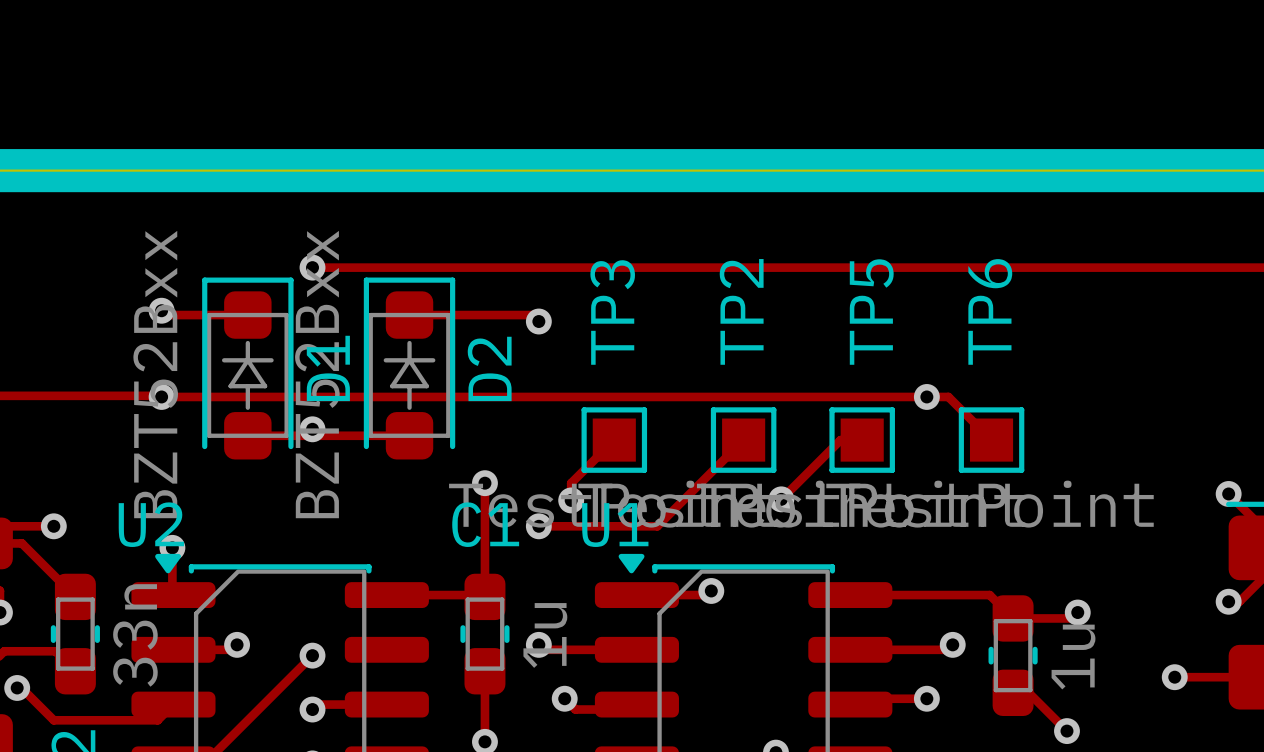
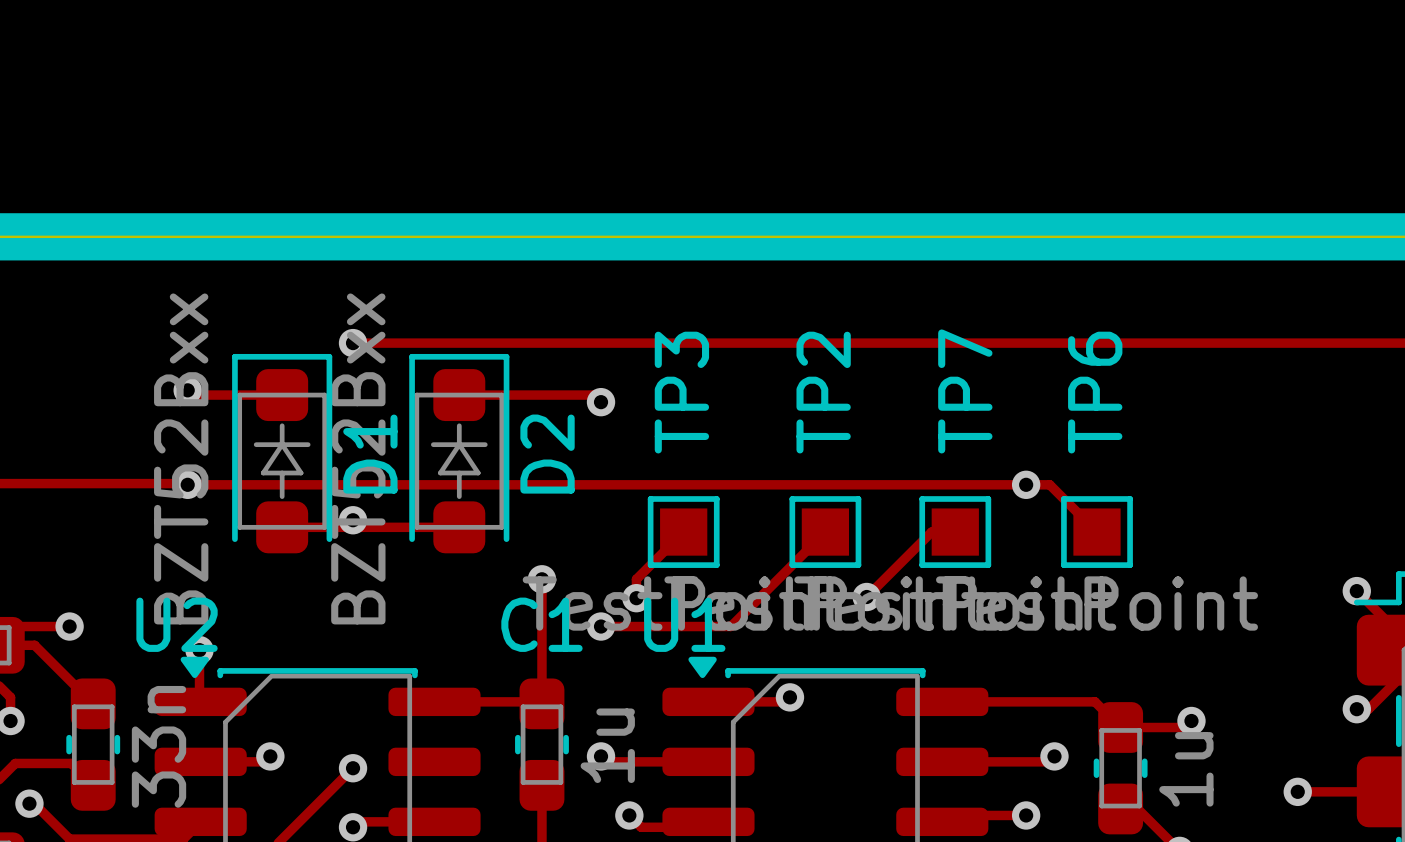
TP5 name: TP5 (871, 312) -> TP7 (965, 391)

